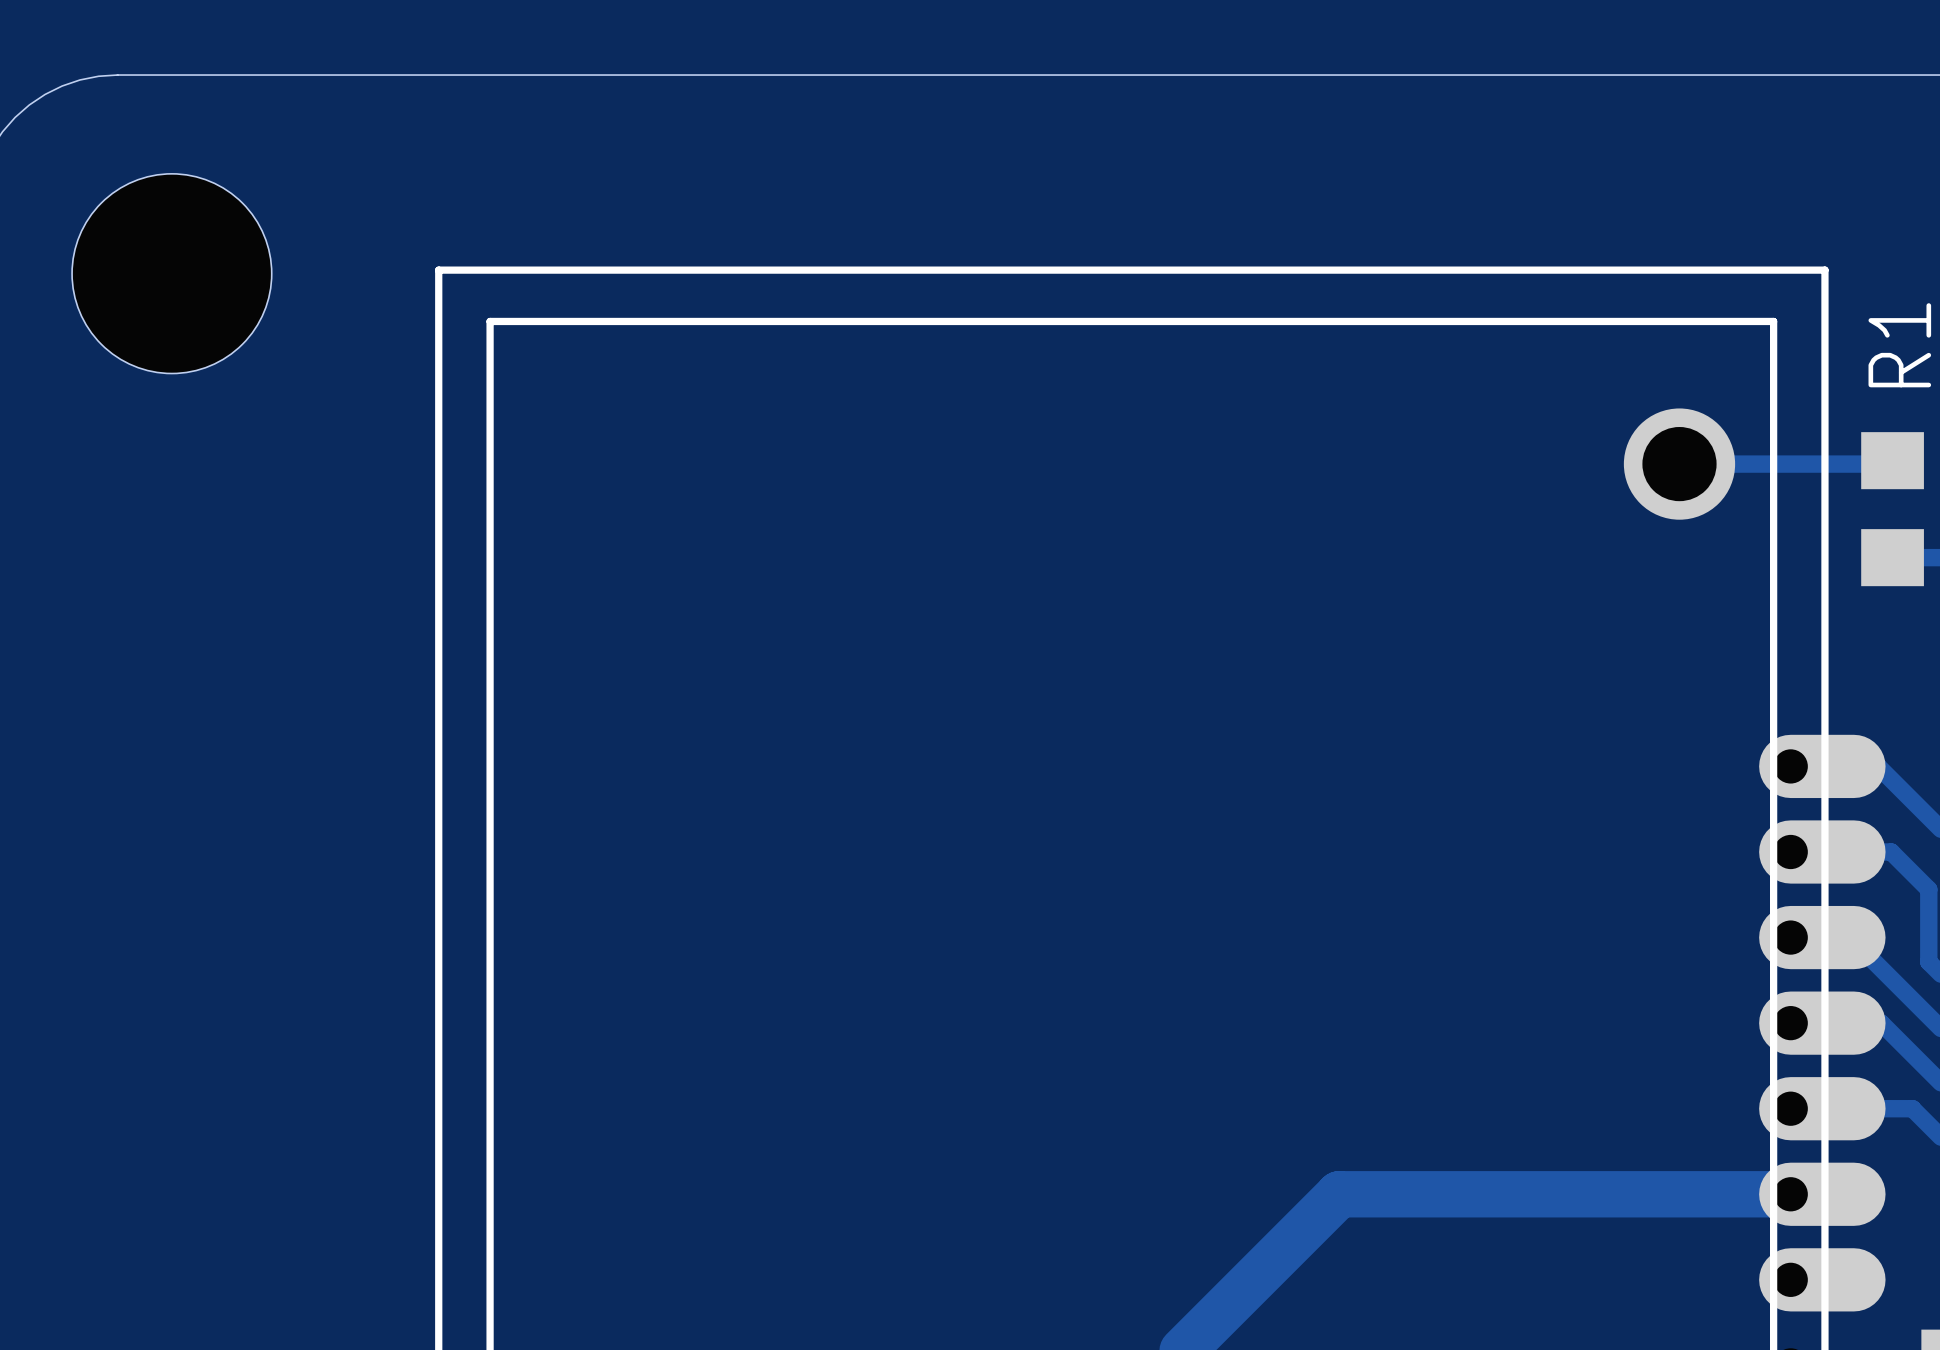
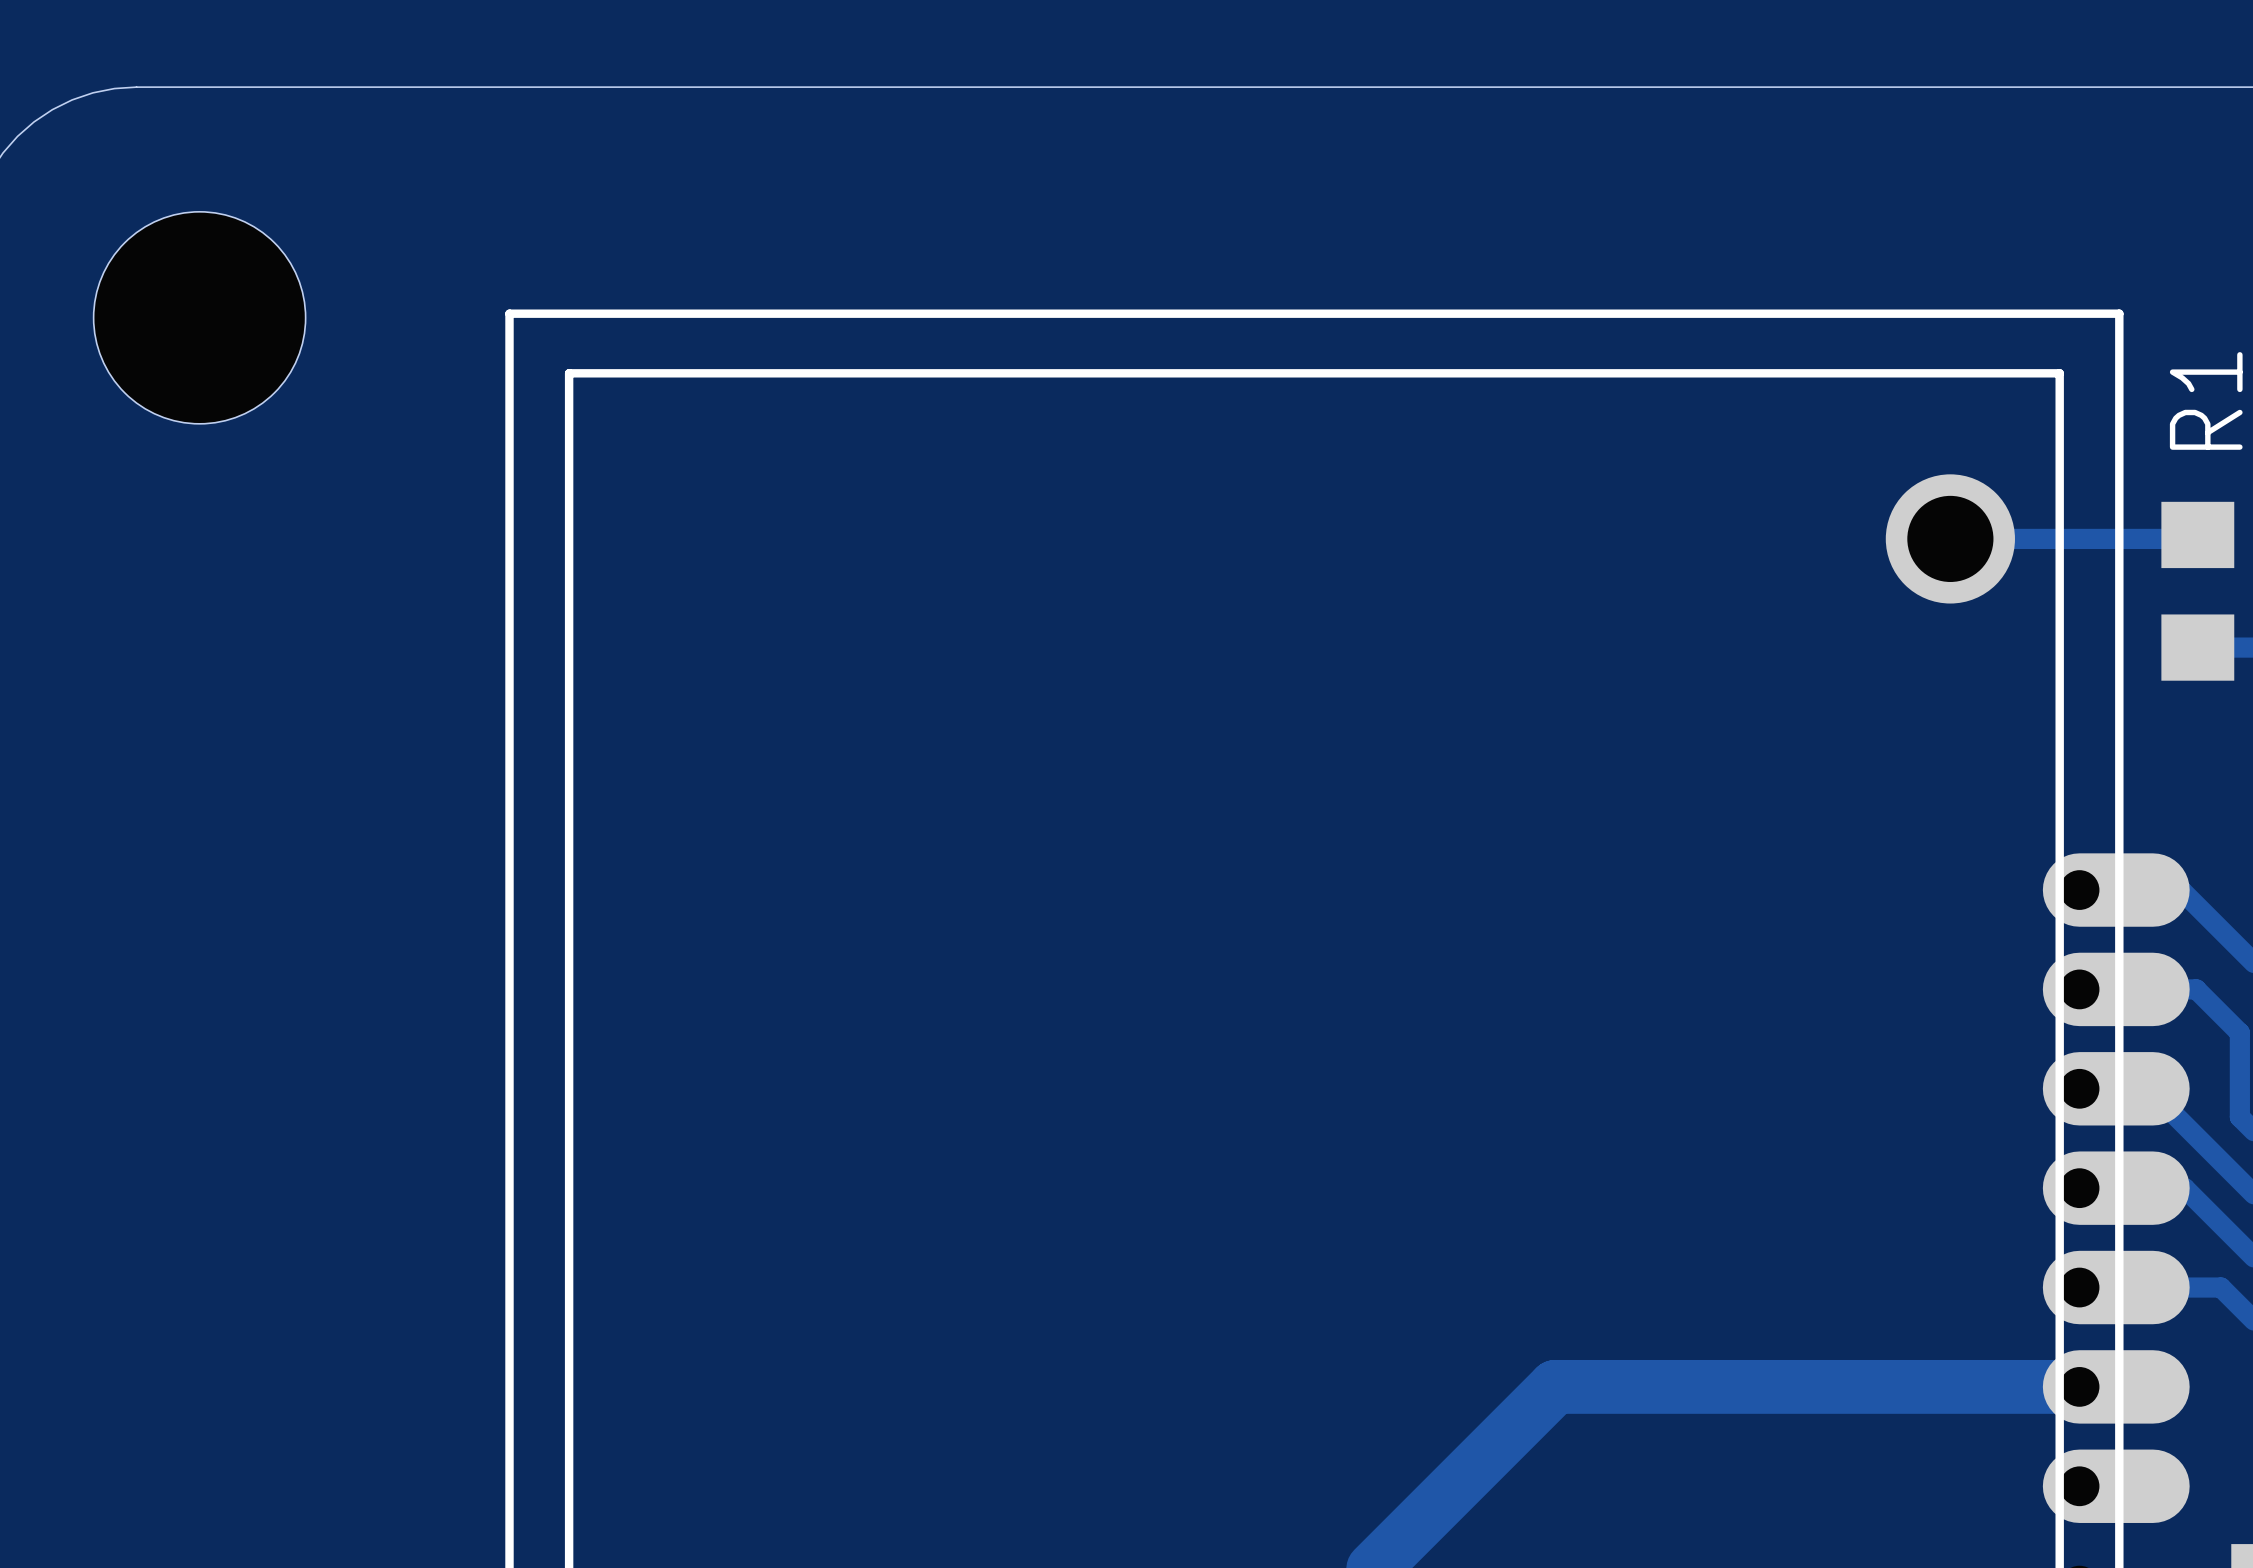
hole size: [72, 173, 272, 374] -> [93, 211, 306, 424]

